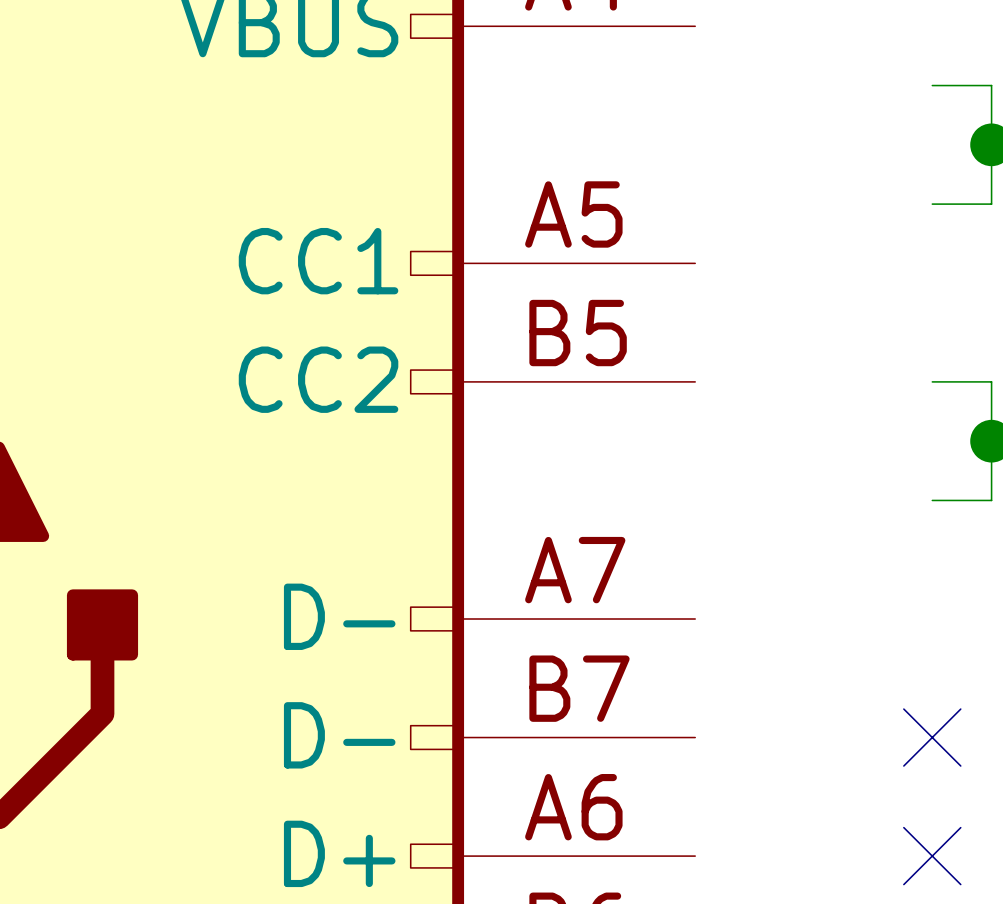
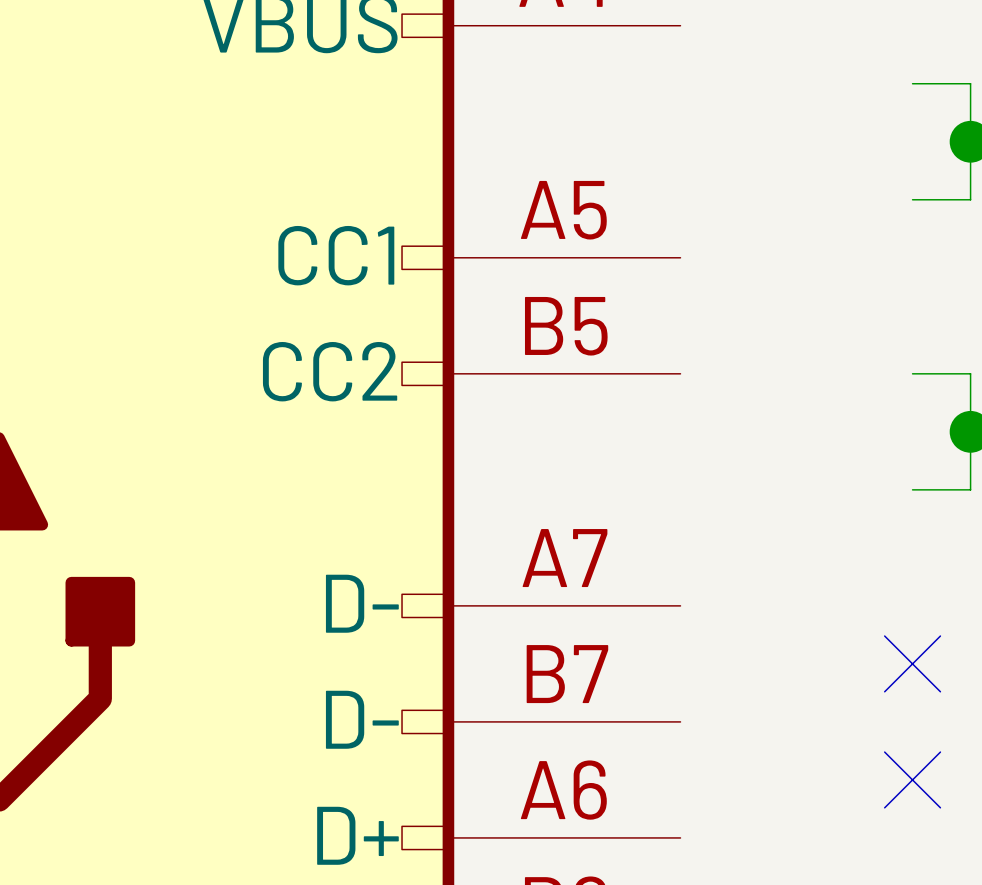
no-connect mark: none -> (912, 663)
no-connect mark: (932, 737) -> none
no-connect mark: none -> (912, 779)
no-connect mark: (932, 856) -> none

